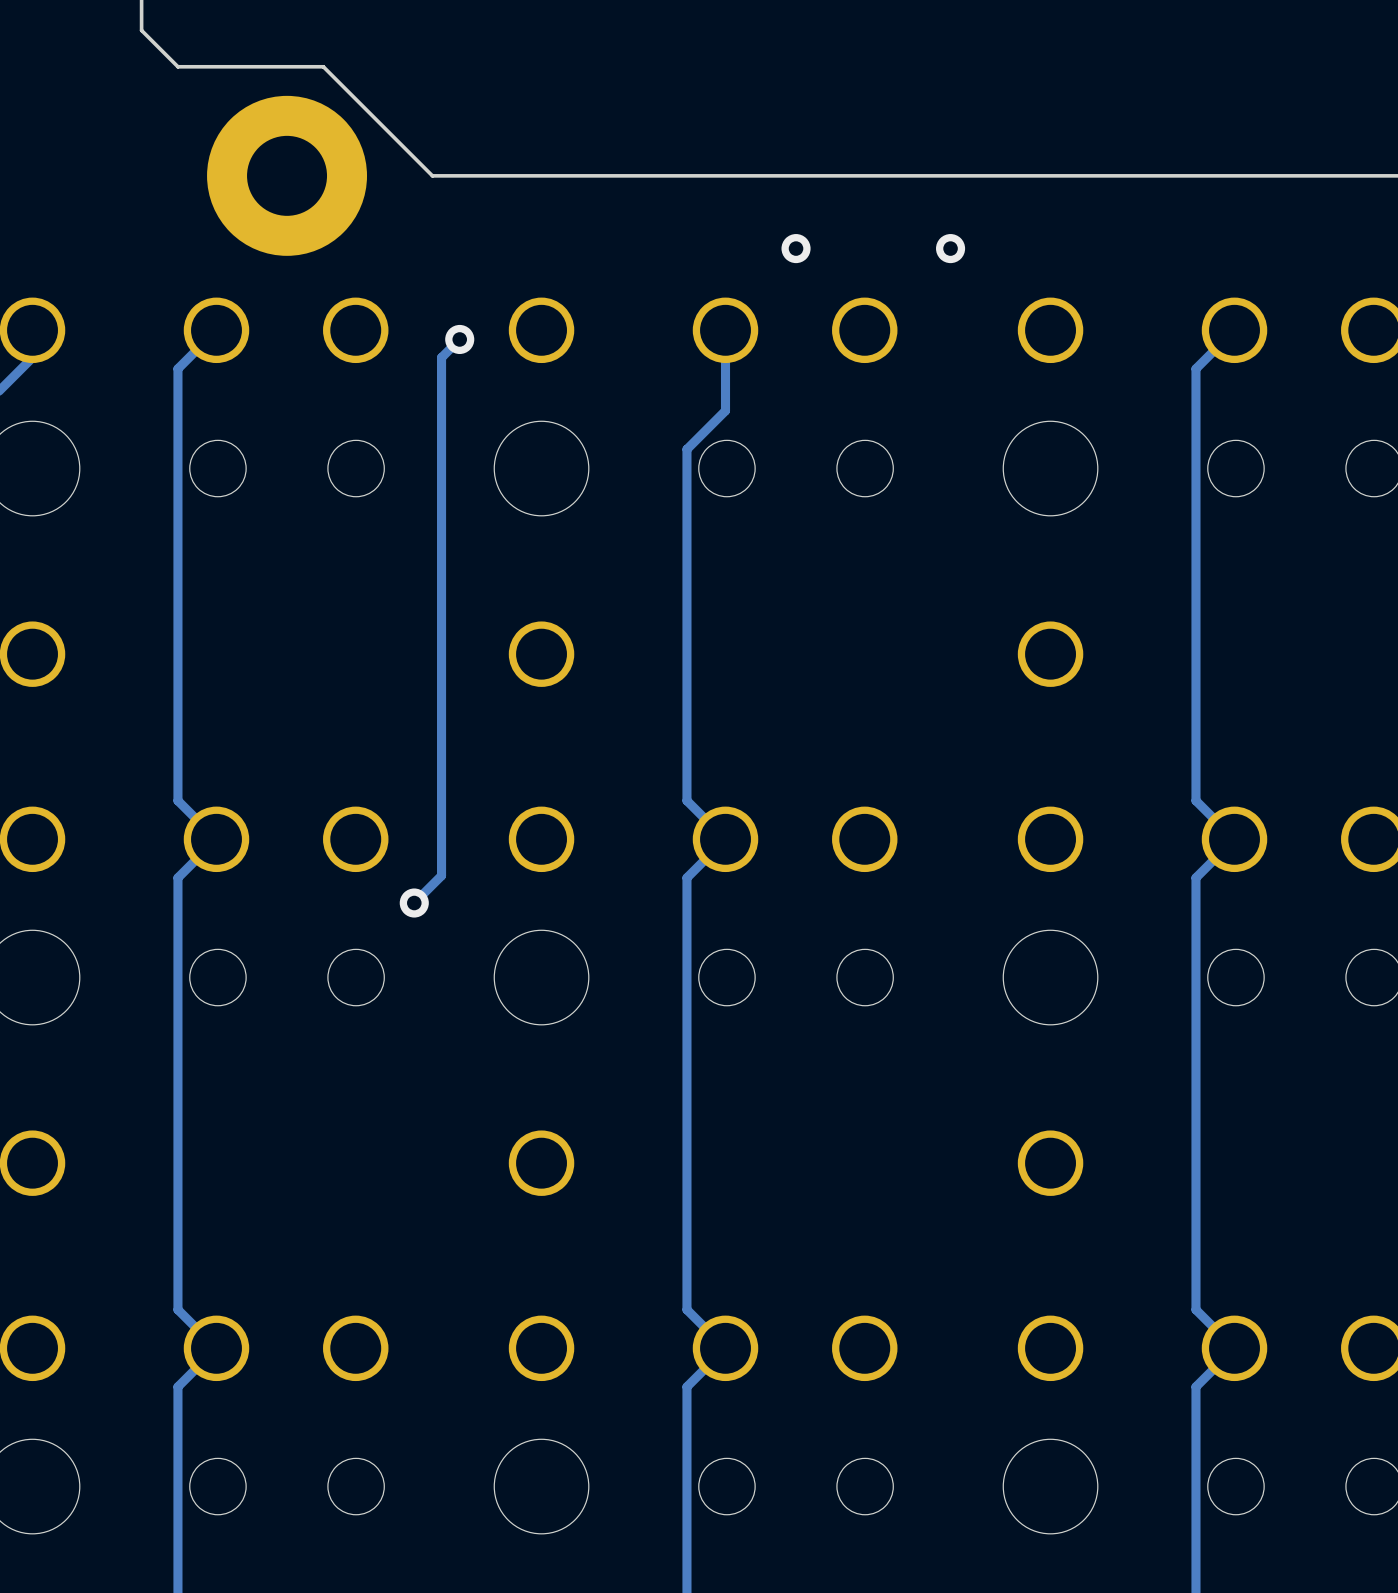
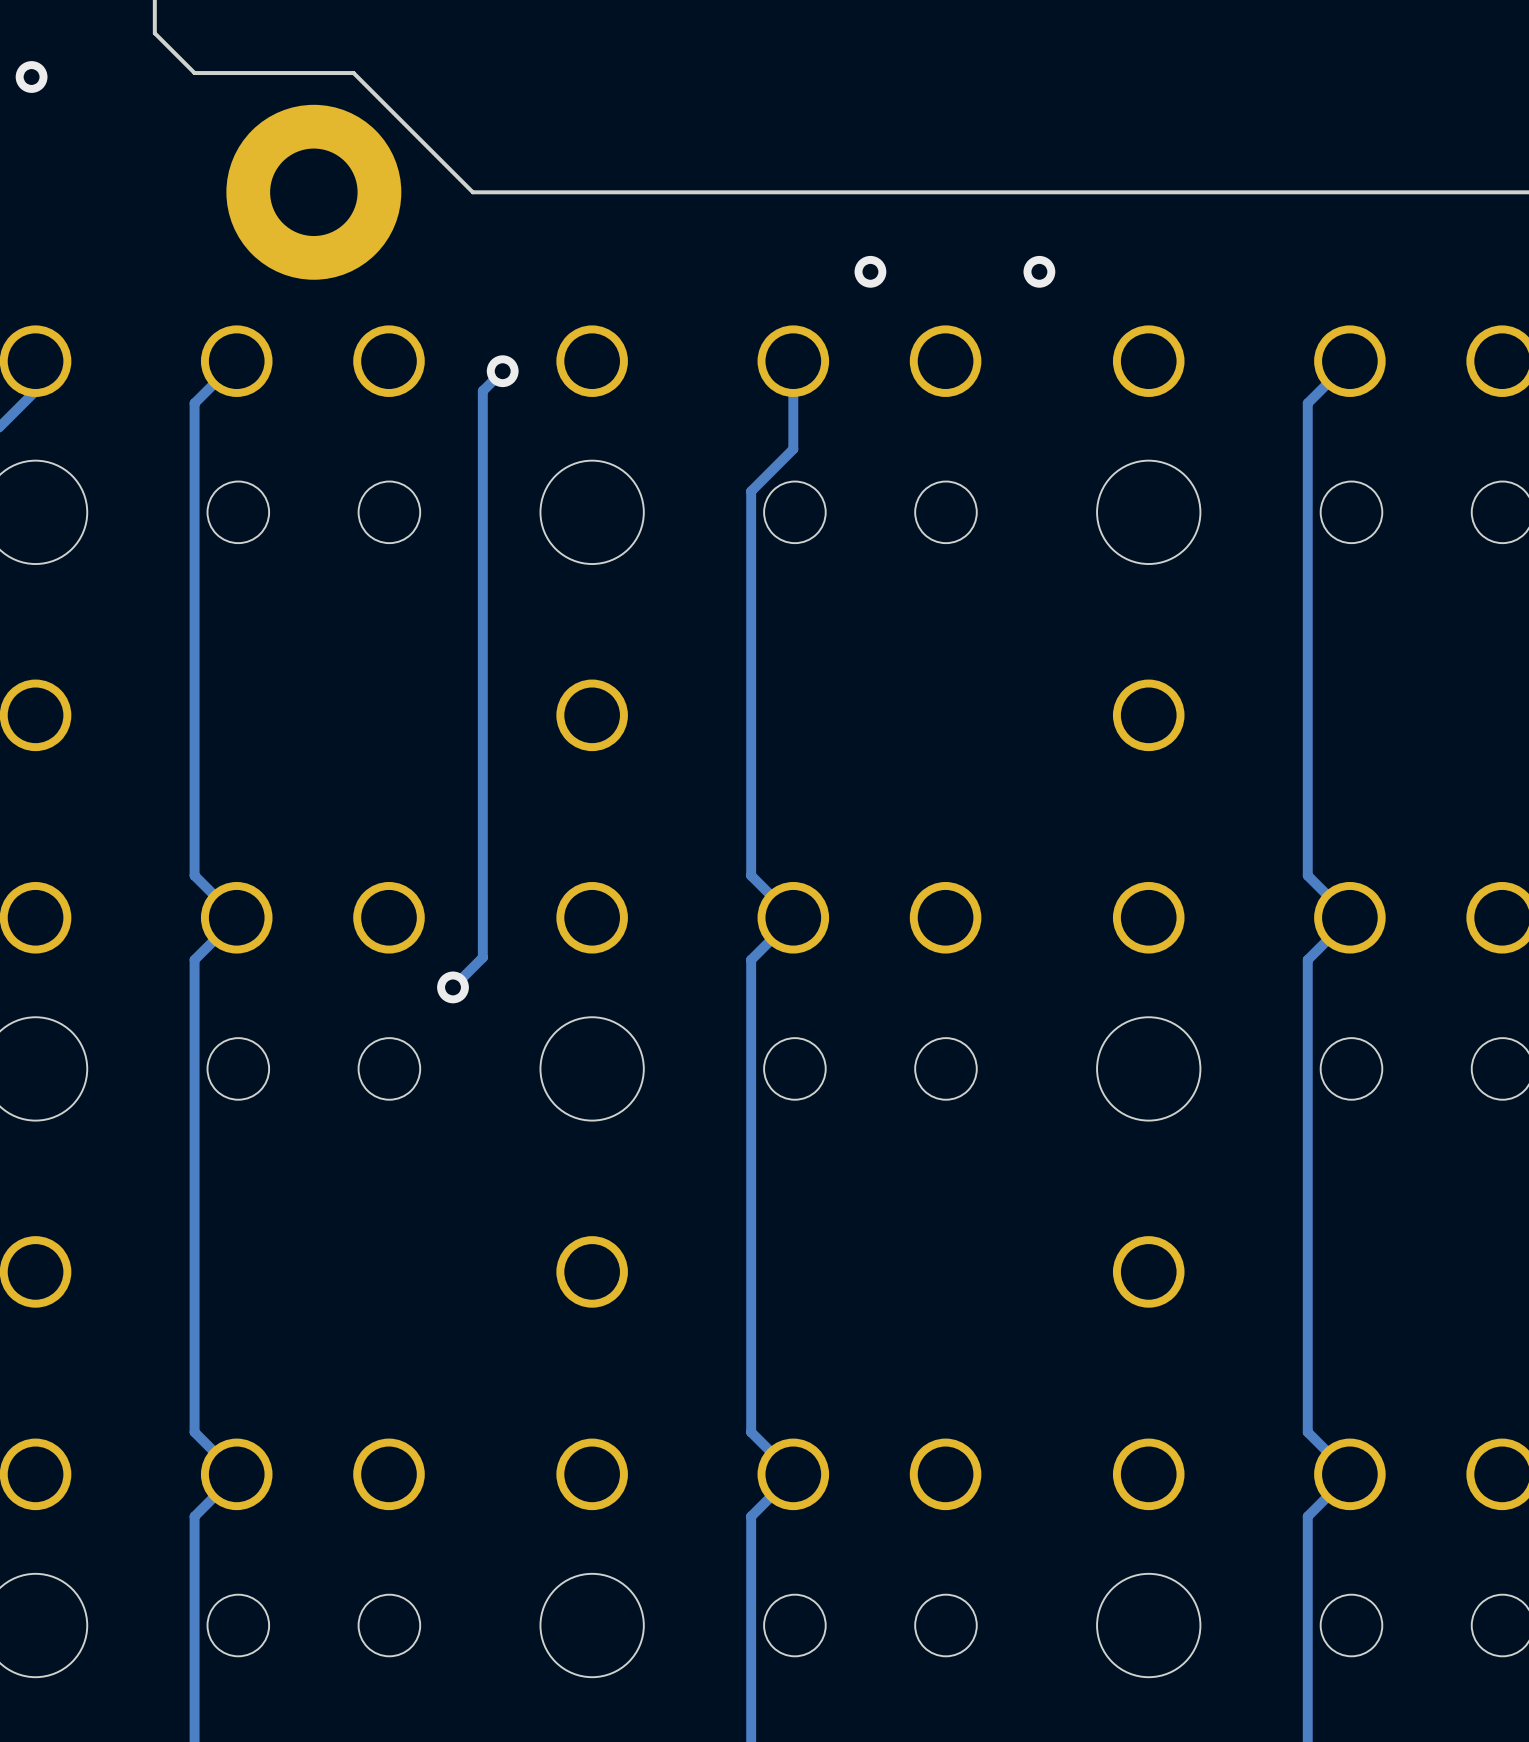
via: none -> (31, 77)

